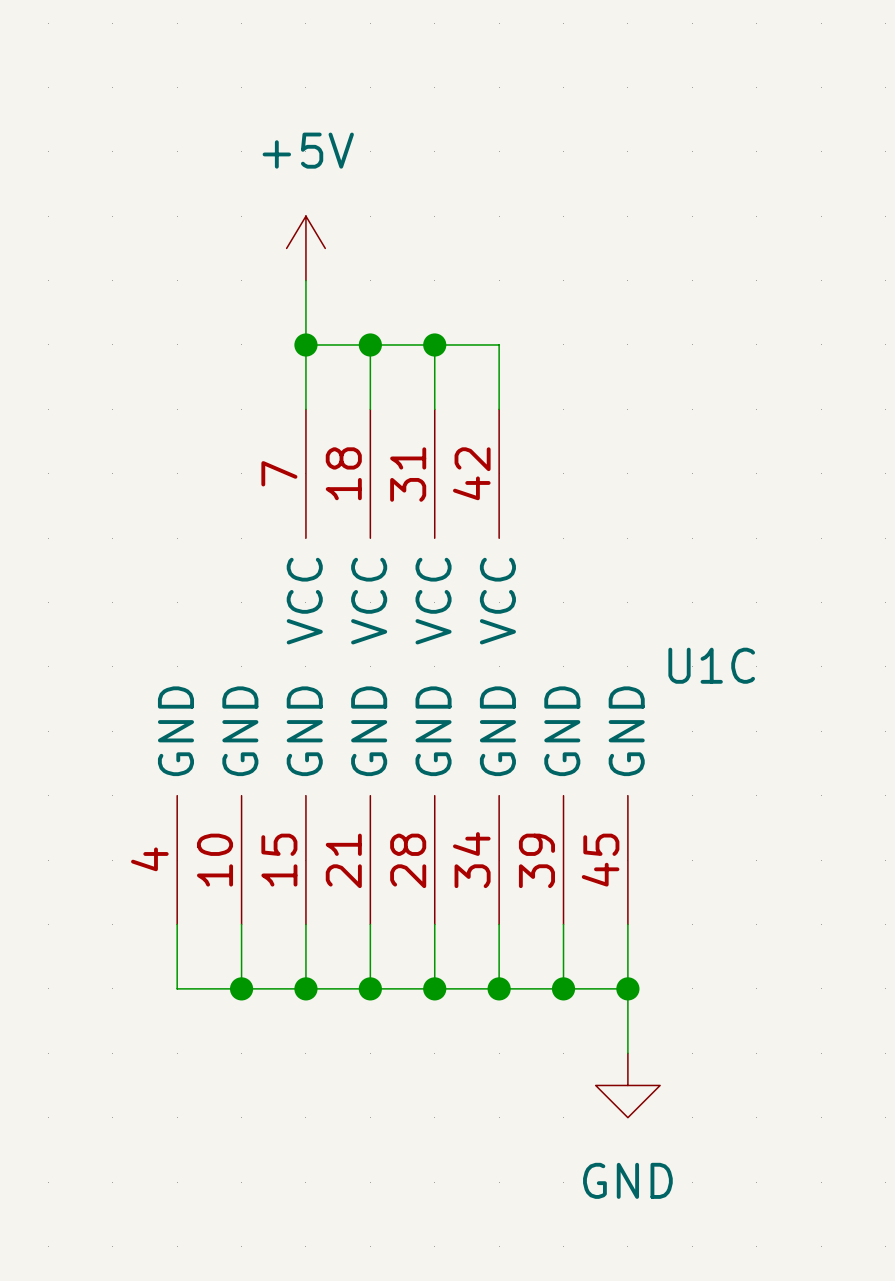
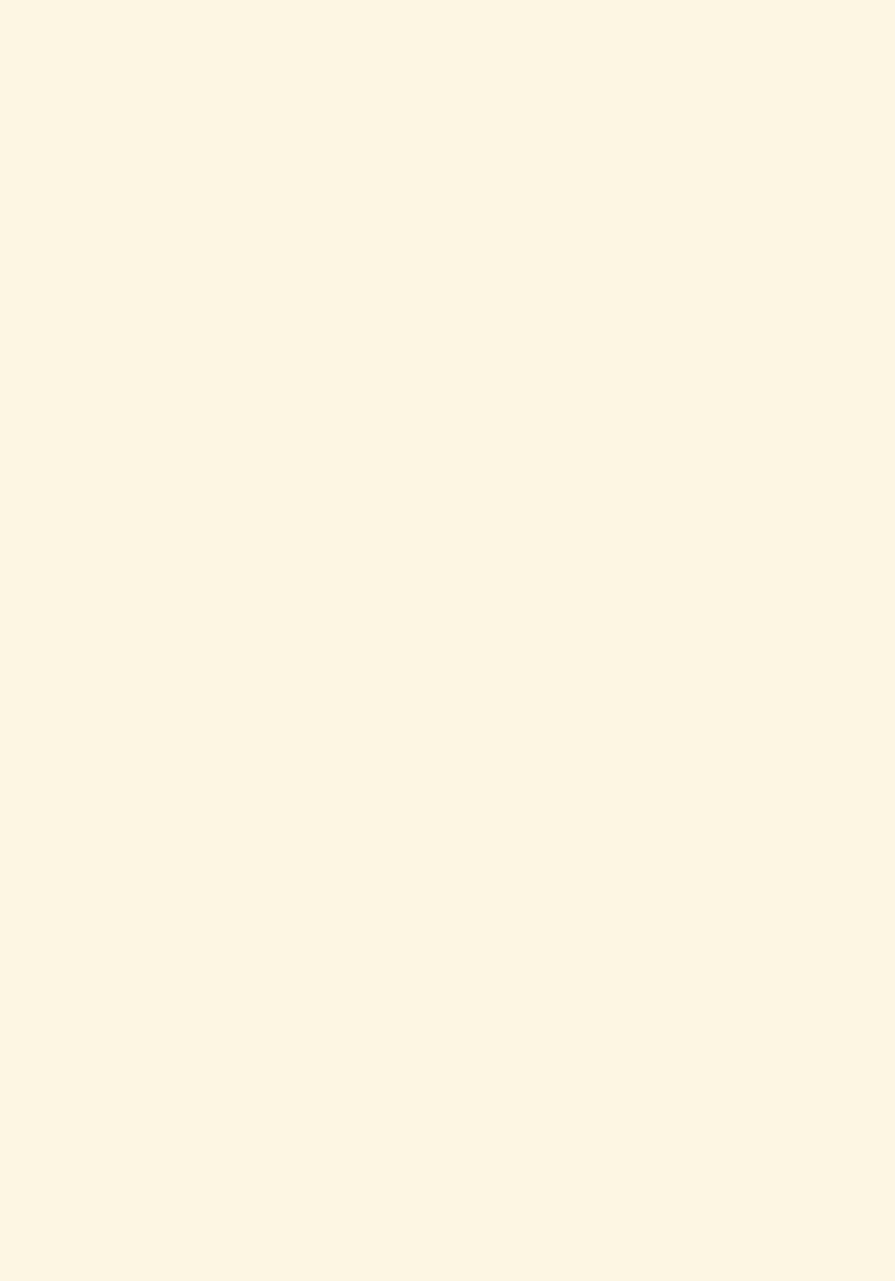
power symbol: +5V (305, 248) -> none
wire: (305, 280) (305, 409) -> none
wire: (305, 344) (499, 344) (499, 409) -> none
junction: (305, 344) -> none
wire: (370, 344) (370, 409) -> none
junction: (370, 344) -> none
wire: (434, 344) (434, 409) -> none
junction: (434, 344) -> none
U1C: (402, 666) -> none
wire: (177, 924) (177, 988) (627, 988) -> none
wire: (241, 924) (241, 988) -> none
wire: (305, 924) (305, 988) -> none
wire: (370, 924) (370, 988) -> none
wire: (434, 924) (434, 988) -> none
wire: (499, 924) (499, 988) -> none
wire: (563, 924) (563, 988) -> none
wire: (627, 924) (627, 1053) -> none
junction: (241, 988) -> none
junction: (305, 988) -> none
junction: (370, 988) -> none
junction: (434, 988) -> none
junction: (499, 988) -> none
junction: (563, 988) -> none
junction: (627, 988) -> none
power symbol: GND (627, 1085) -> none

